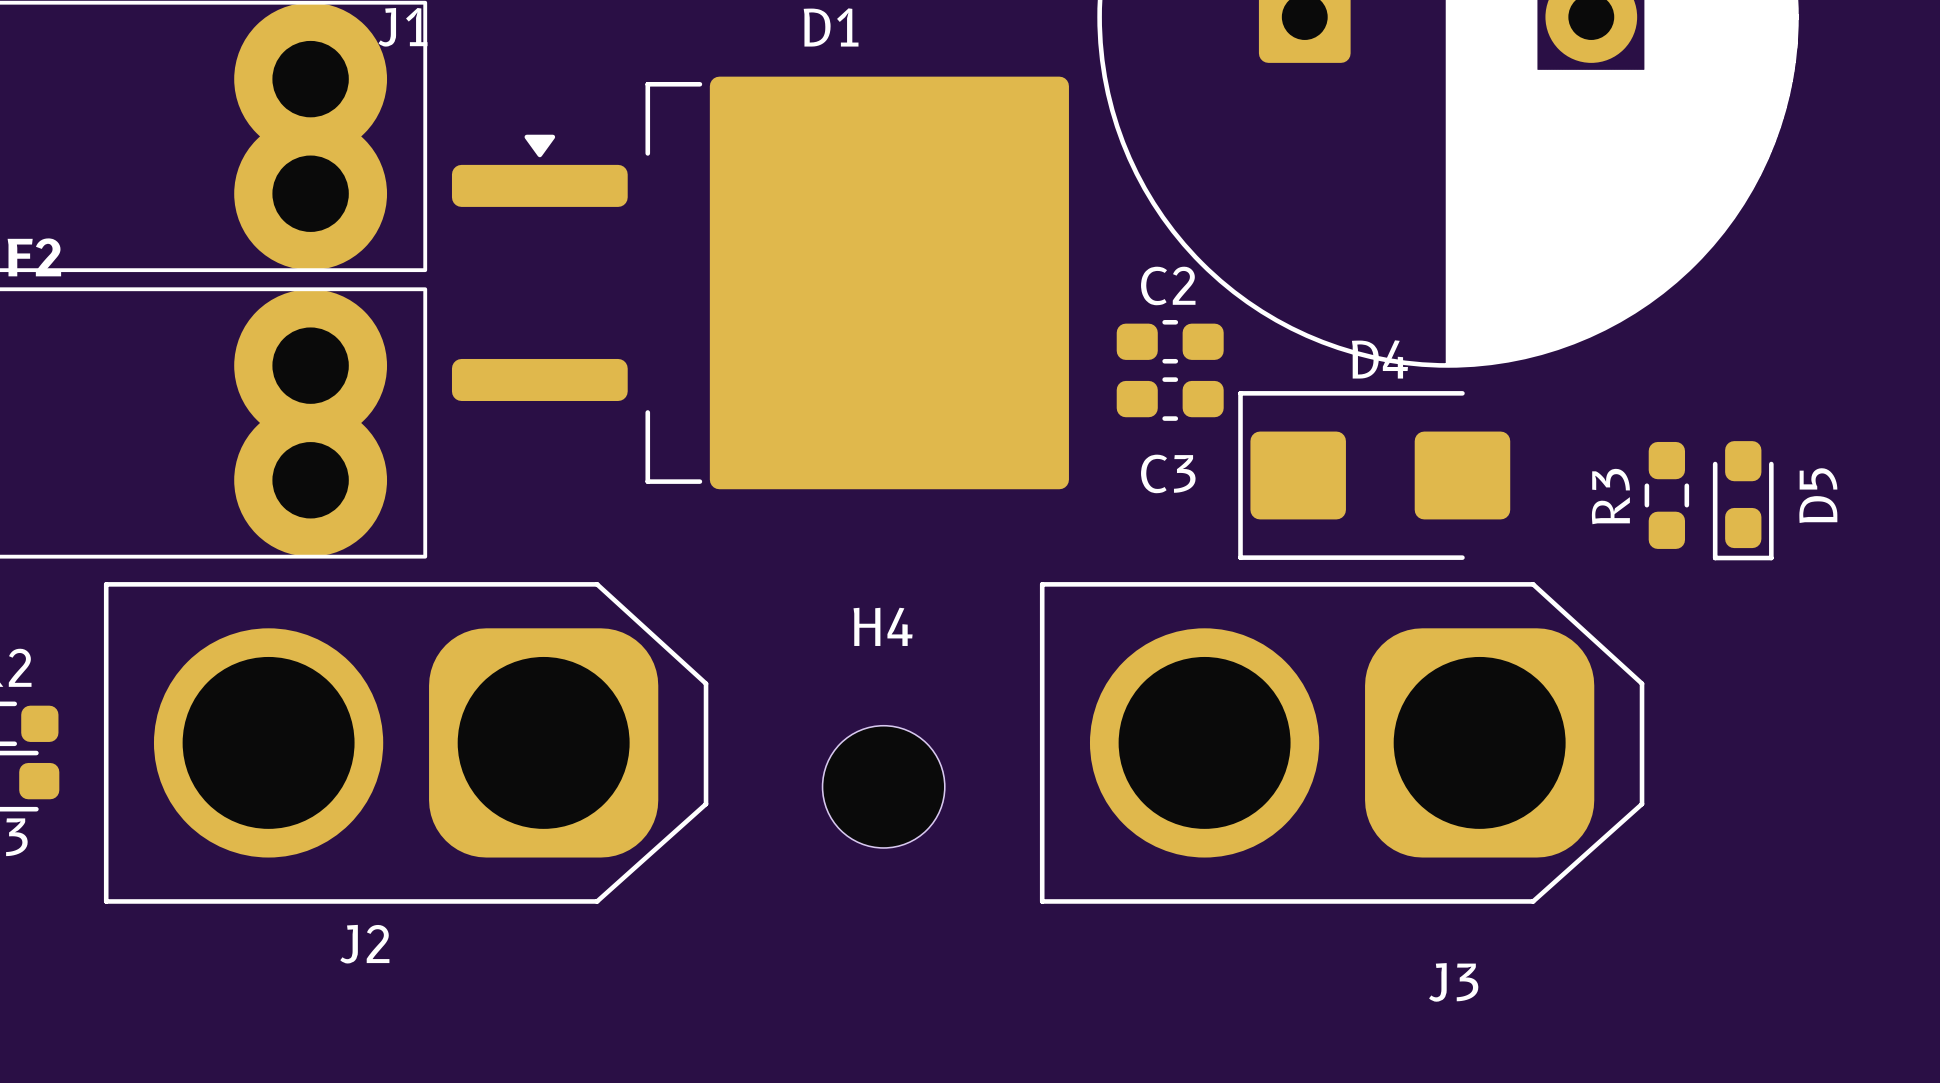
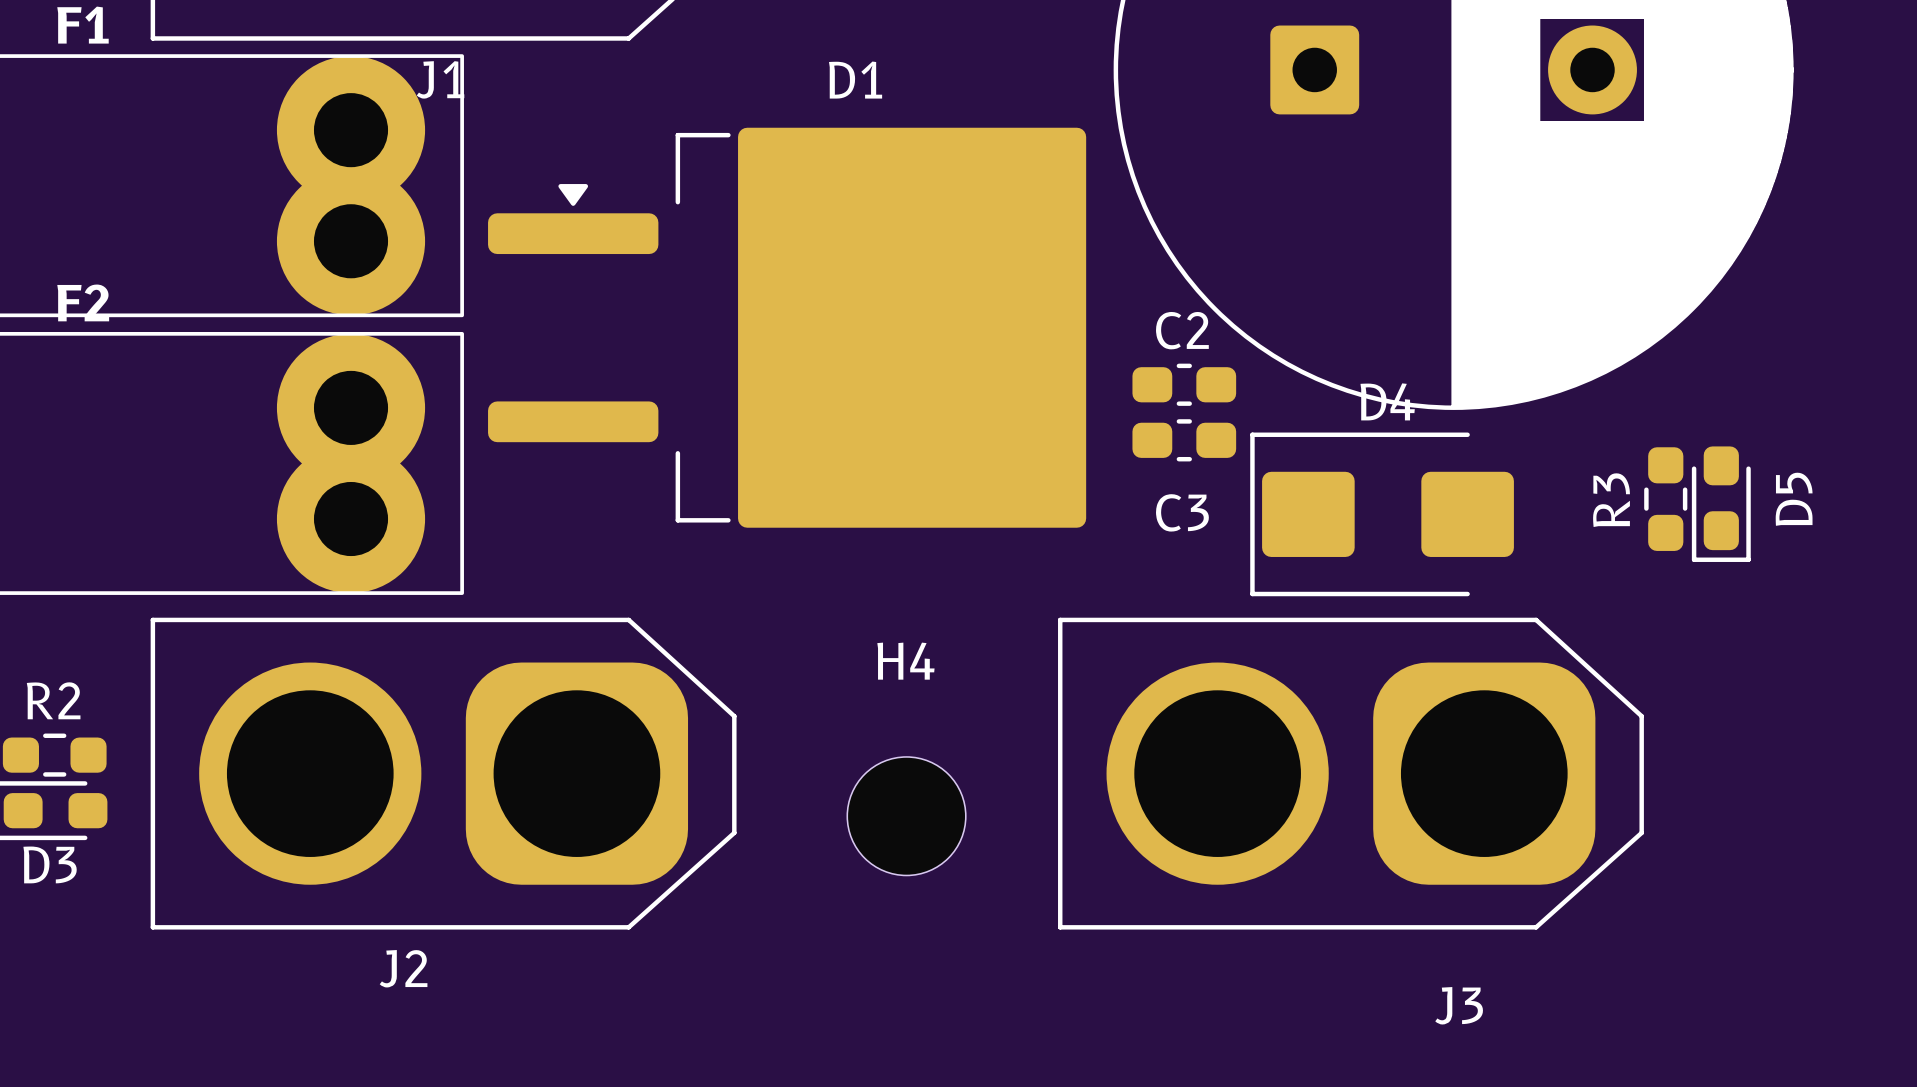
R3 position: (1666, 495) -> (1665, 499)
D5 position: (1743, 500) -> (1721, 504)

